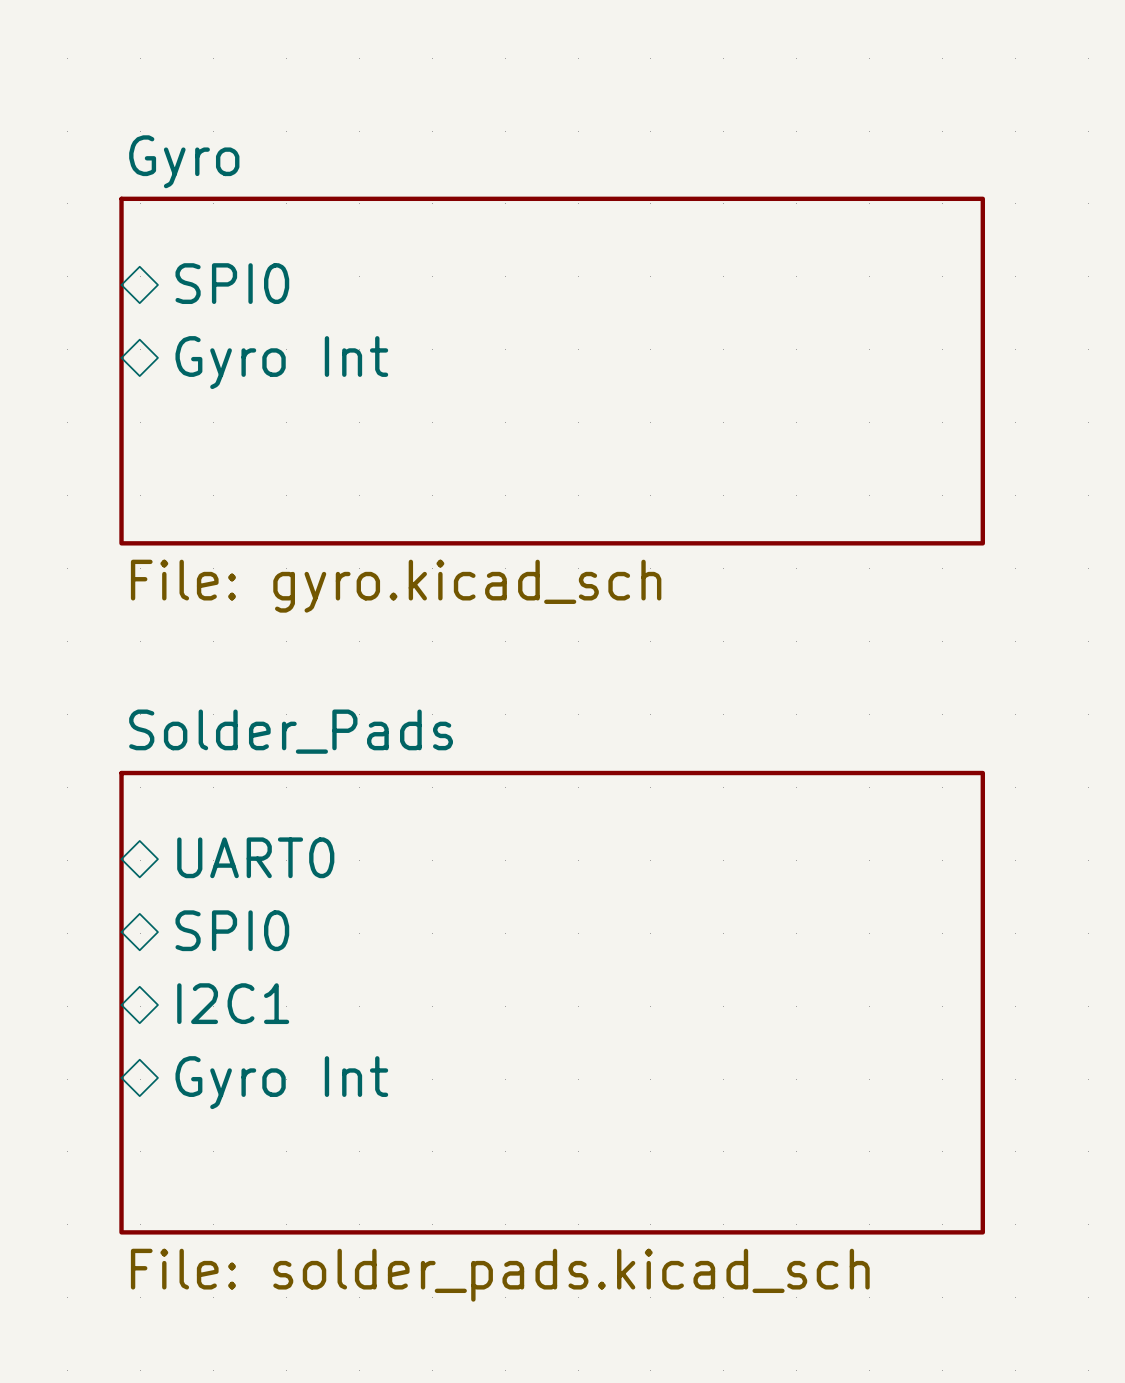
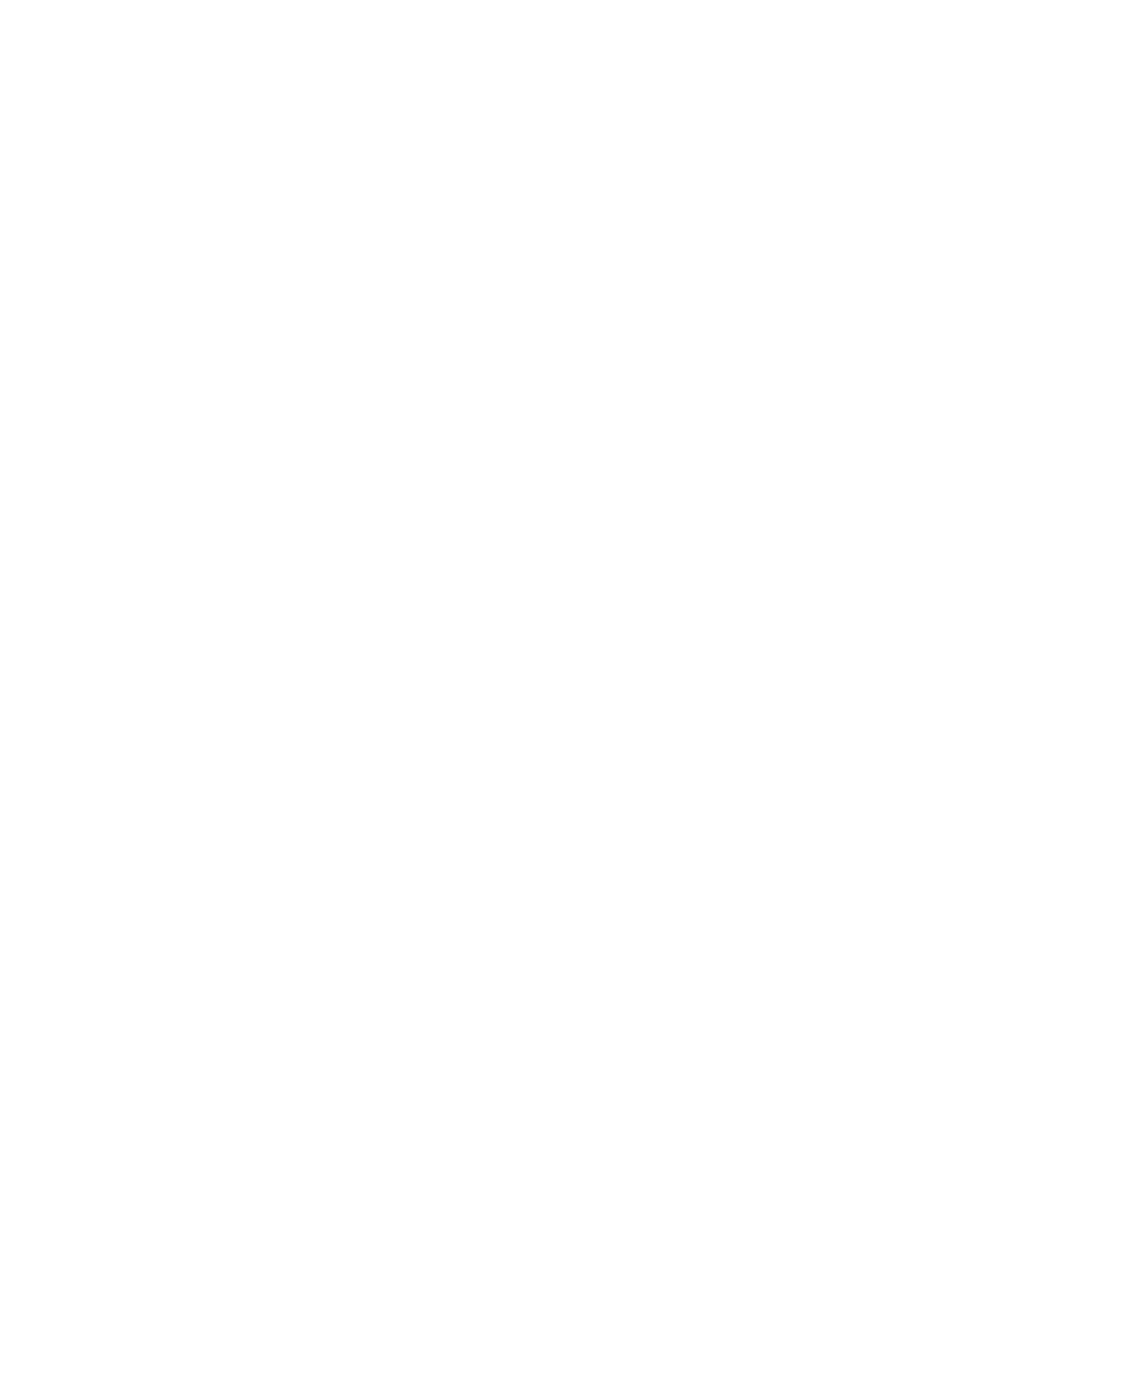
sheet pin: SPI0 (232, 283) -> none
sheet pin: Gyro Int (281, 362) -> none
sheet Gyro: File: gyro.kicad_sch (552, 371) -> none
sheet pin: UART0 (255, 857) -> none
sheet pin: SPI0 (232, 930) -> none
sheet Solder_Pads: File: solder_pads.kicad_sch (552, 1002) -> none
sheet pin: I2C1 (233, 1003) -> none
sheet pin: Gyro Int (281, 1082) -> none

